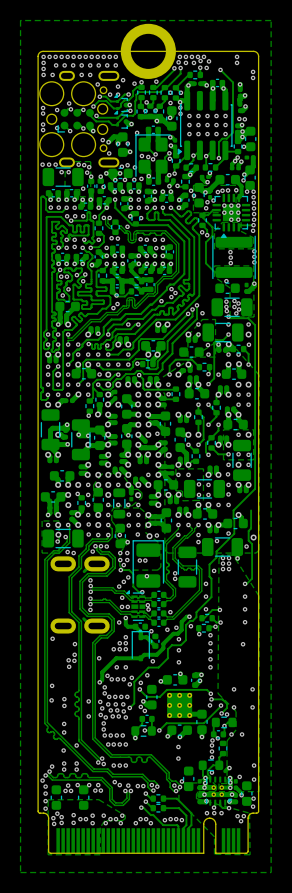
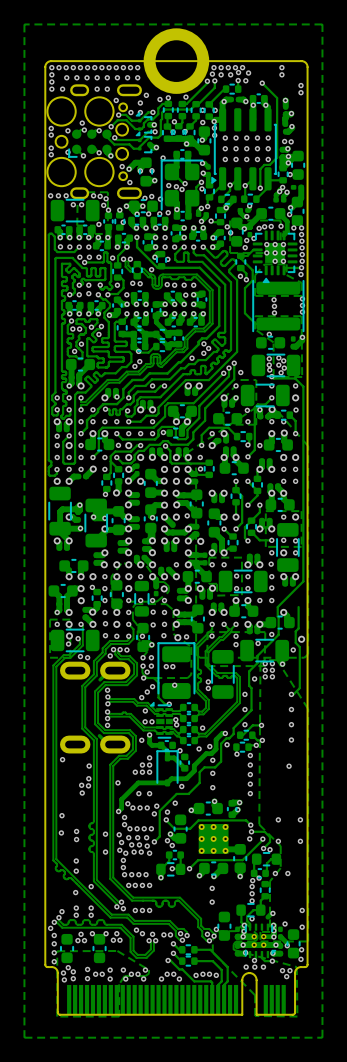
zone outline: none -> (265, 632) (264, 666) (207, 666) (207, 632) (265, 632)
via: (224, 726) -> none

